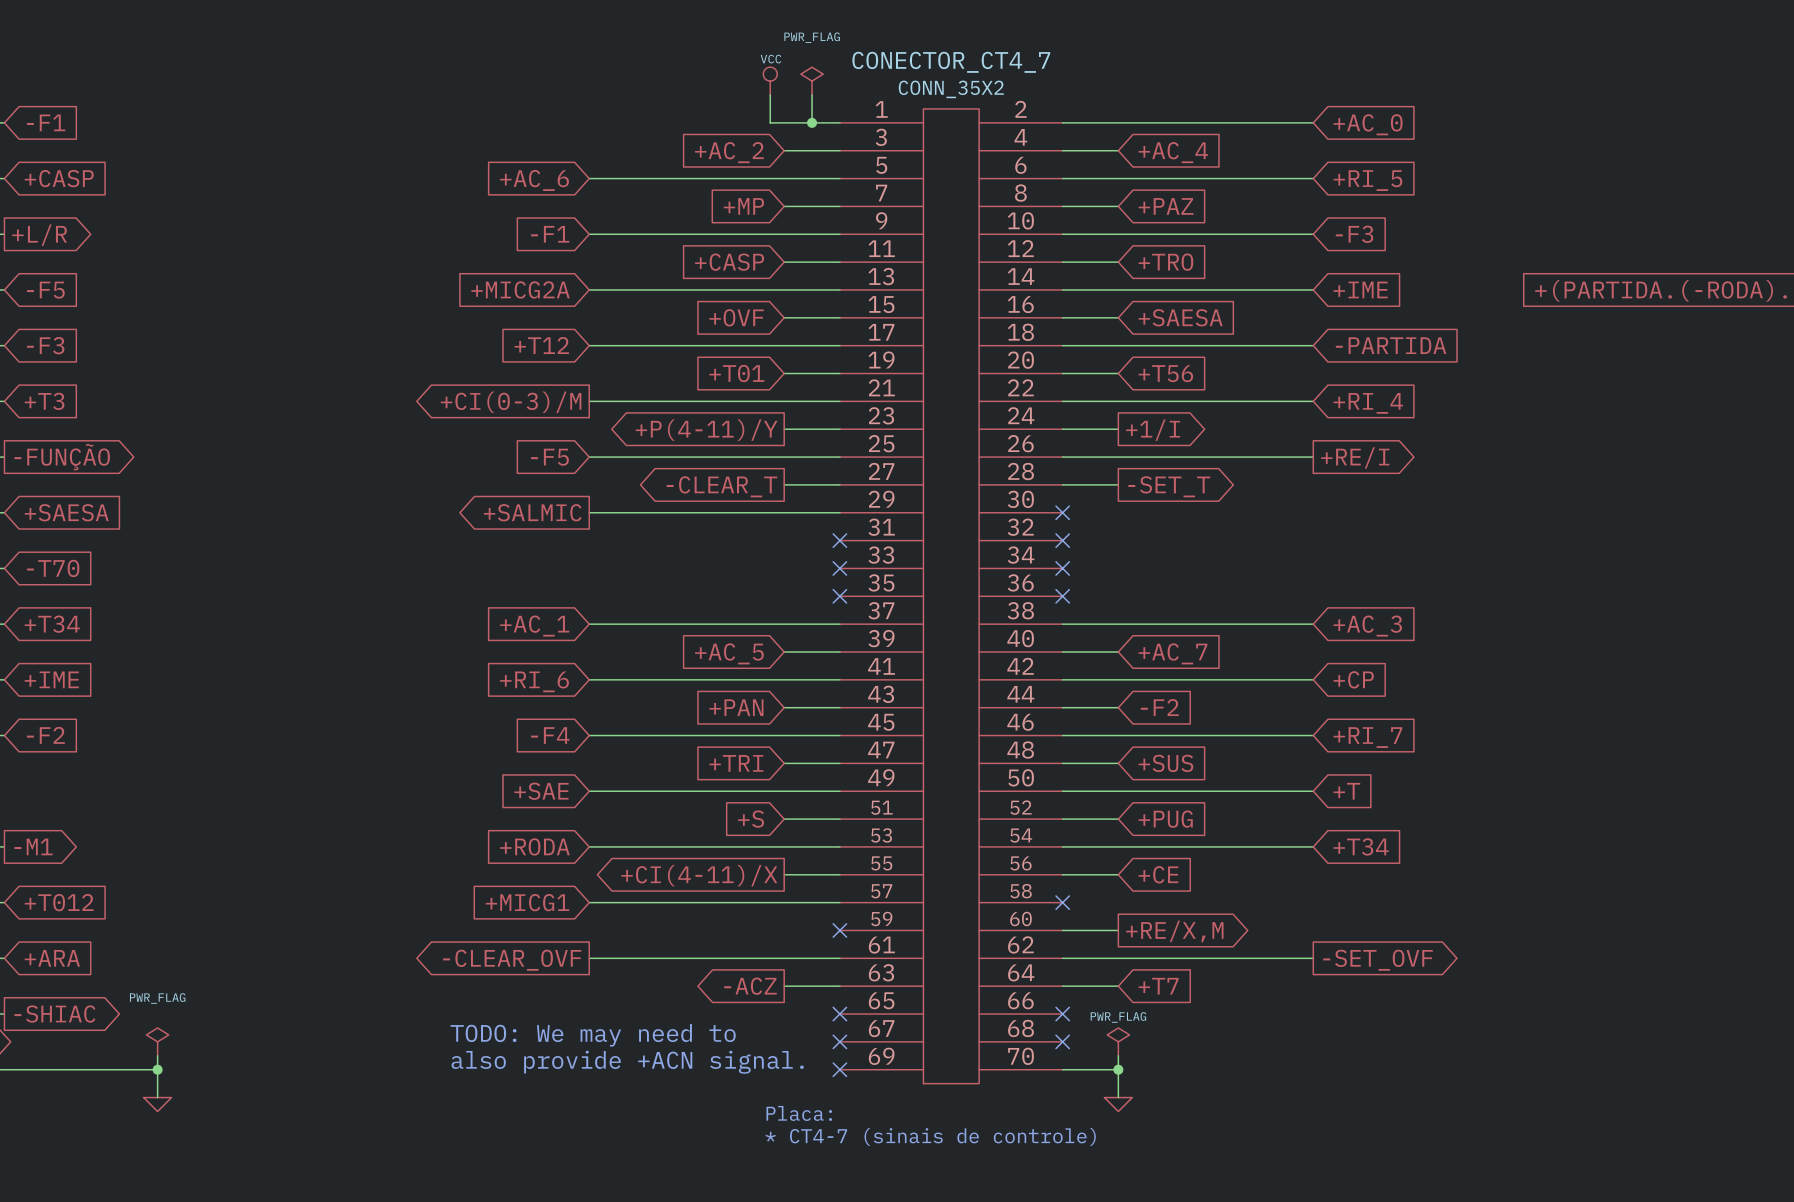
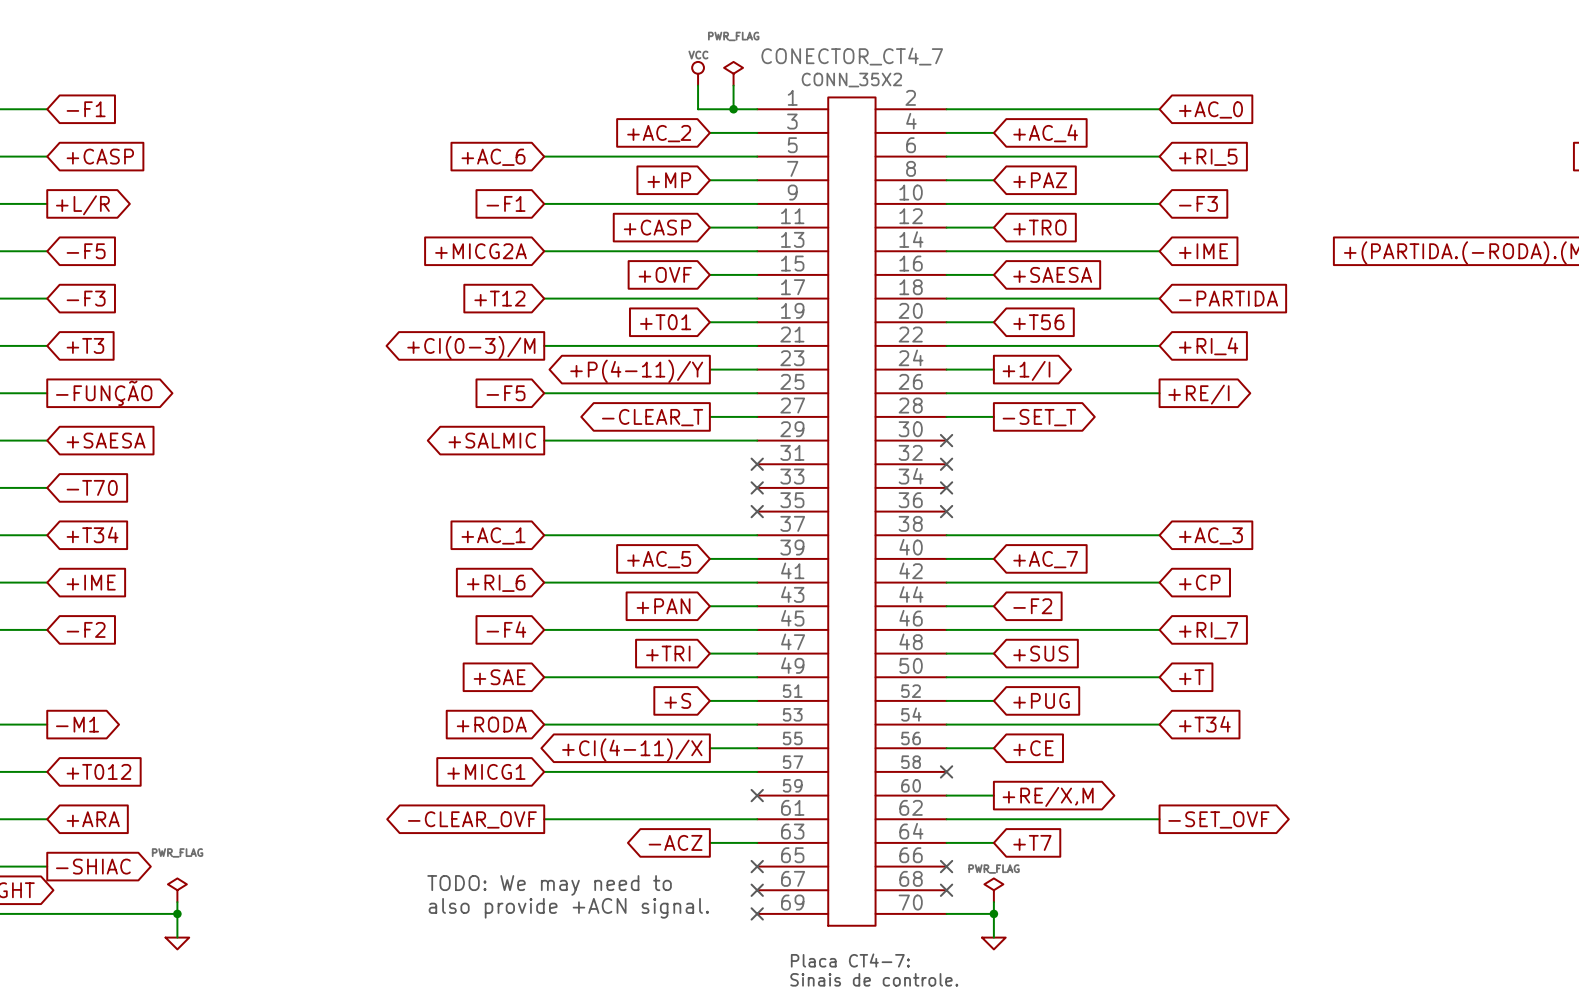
text: Placa: (799, 1113) -> none
text: none -> Placa CT4-7: (850, 960)
text: * CT4-7 (sinais de controle) (930, 1136) -> Sinais de controle. (874, 979)

